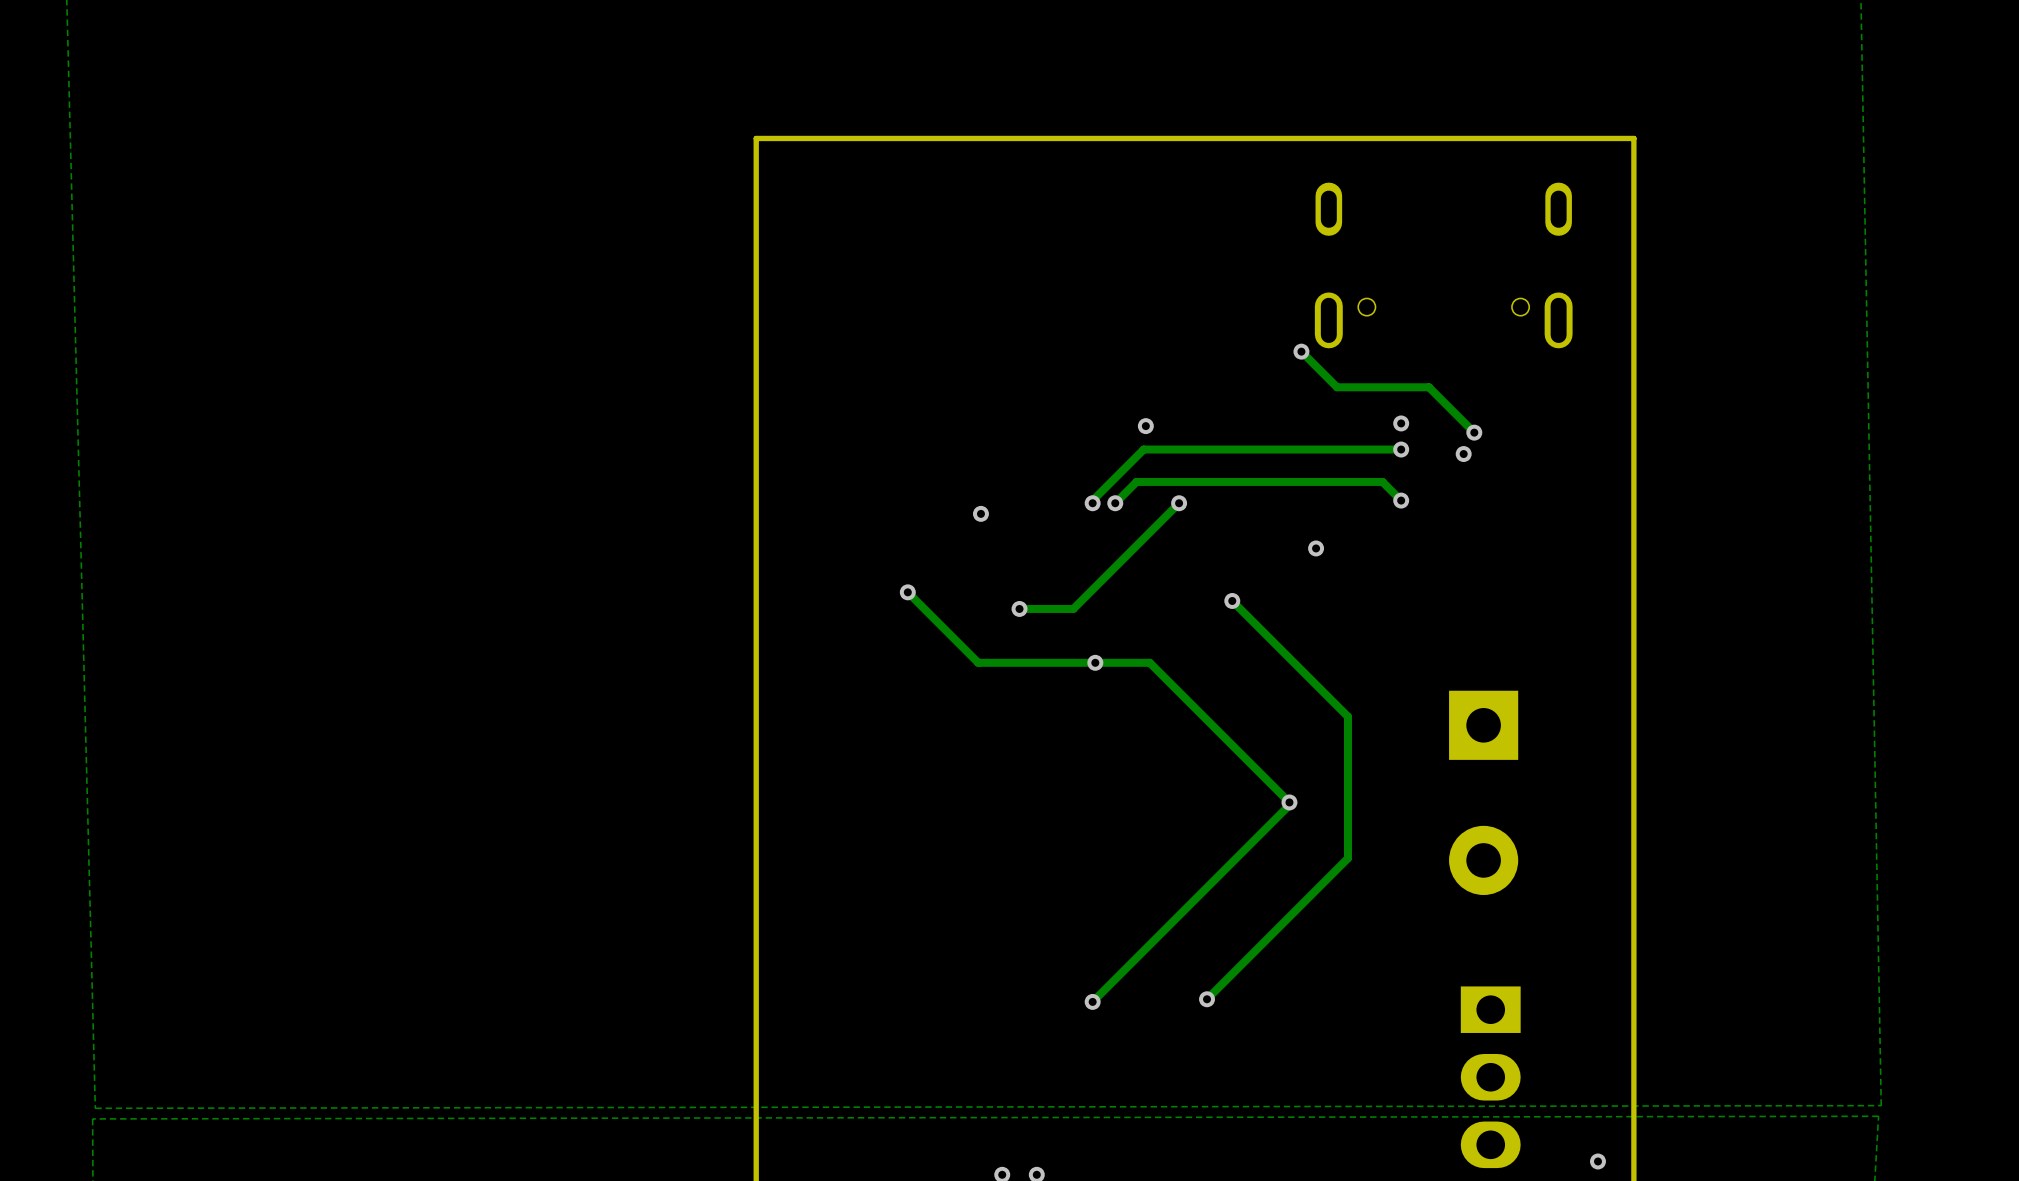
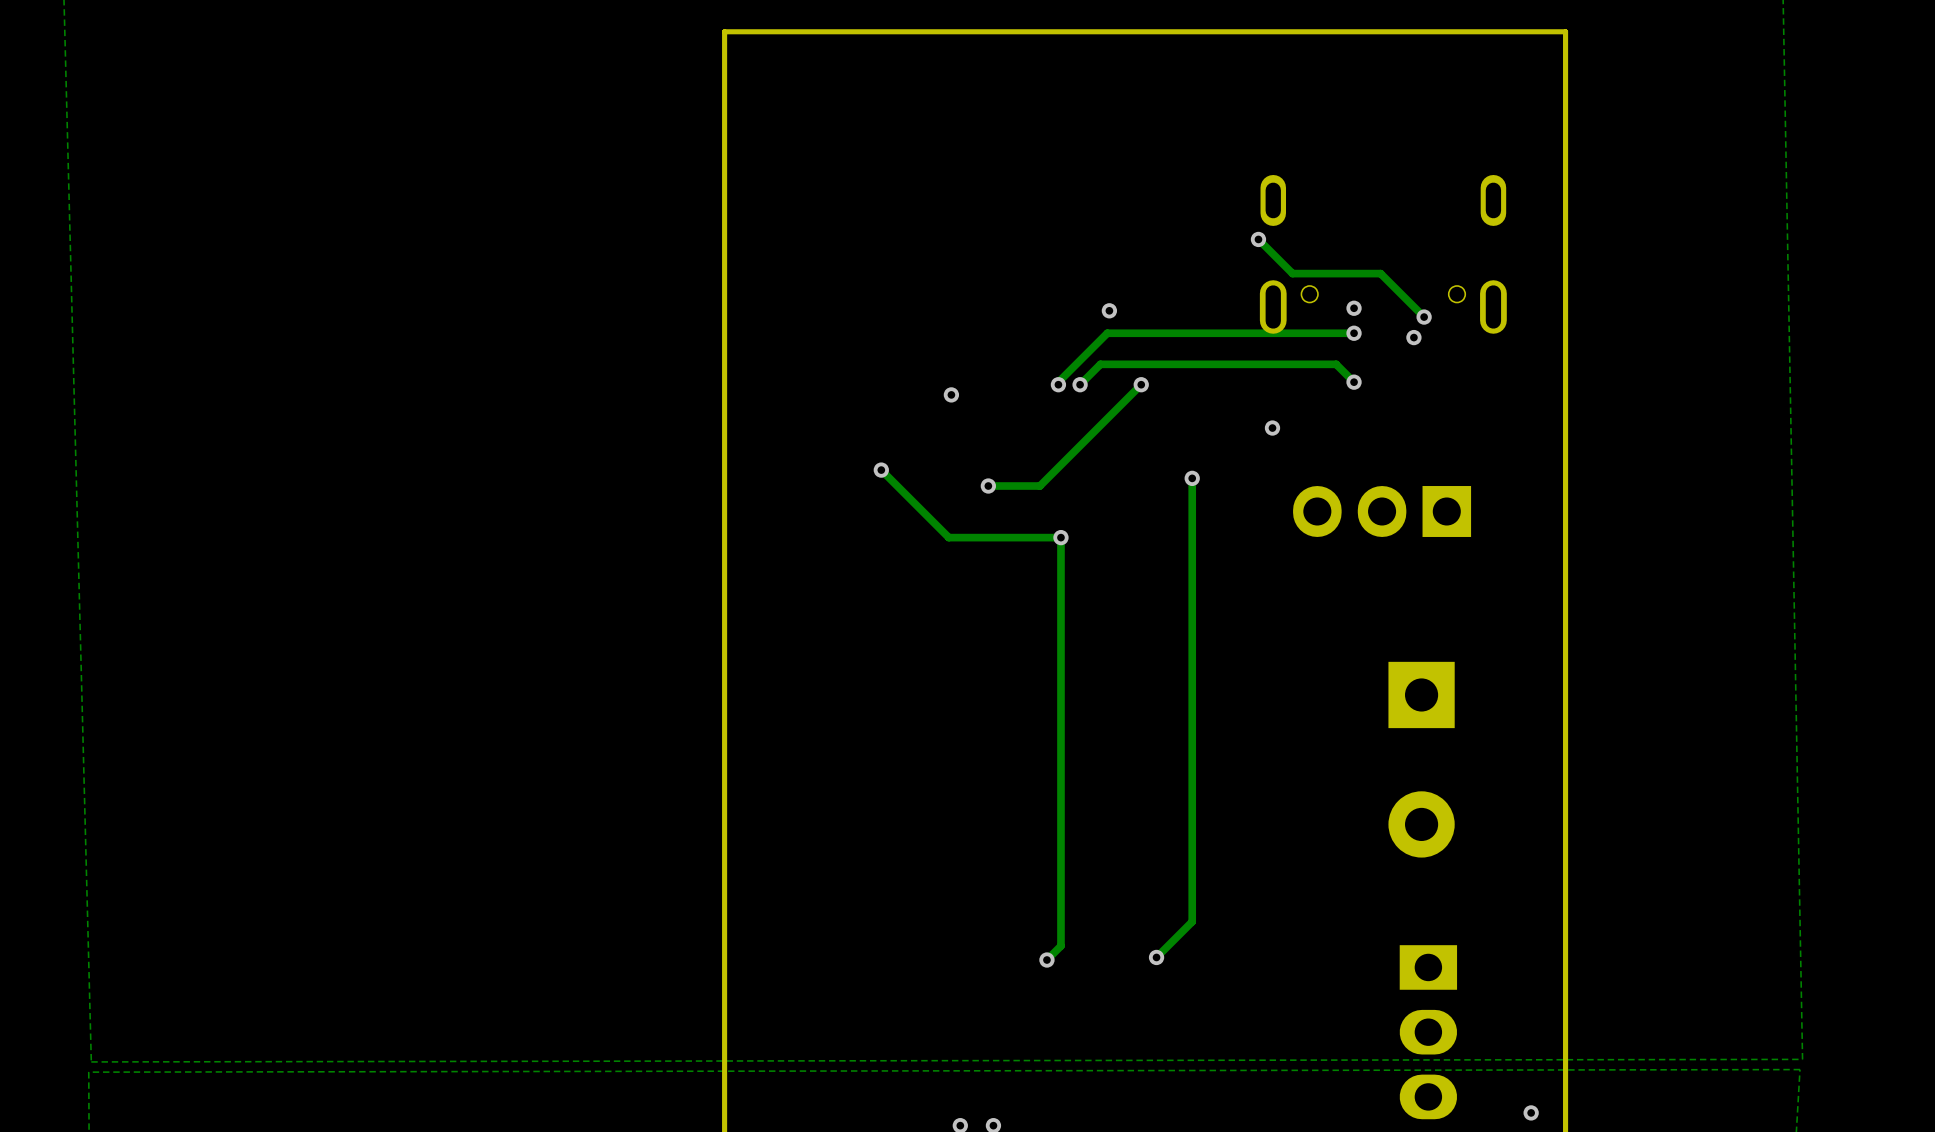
board edge: (1633, 138) (756, 138) -> (1565, 132) (1565, 31) (724, 31) (724, 132)
via: none -> (1258, 239)
via: none -> (1354, 308)
via: none -> (1109, 310)
via: none -> (1424, 317)
via: none -> (1354, 333)
track: (1301, 351) (1337, 387) (1428, 387) (1474, 432) -> (1258, 239) (1292, 273) (1380, 273) (1424, 317)
via: (1301, 351) -> none
via: none -> (1413, 337)
via: none -> (1354, 382)
via: none -> (1058, 384)
via: none -> (1080, 384)
via: none -> (1141, 384)
via: none -> (951, 394)
via: (1401, 423) -> none
via: (1145, 426) -> none
via: (1474, 432) -> none
via: none -> (1272, 428)
track: (1401, 449) (1143, 449) (1092, 500) (1092, 503) -> (1354, 333) (1107, 333) (1058, 382) (1058, 384)
via: (1401, 449) -> none
via: (1463, 454) -> none
via: none -> (881, 470)
via: none -> (1192, 478)
track: (1401, 500) (1382, 481) (1136, 481) (1115, 503) -> (1354, 382) (1336, 364) (1100, 364) (1080, 384)
via: (1401, 500) -> none
via: (1092, 503) -> none
via: (1115, 503) -> none
track: (1179, 503) (1073, 608) (1019, 608) -> (1141, 384) (1039, 486) (988, 486)
via: (1179, 503) -> none
via: none -> (988, 486)
via: (980, 513) -> none
part: none -> (1382, 511)
via: (1316, 548) -> none
via: none -> (1060, 537)
track: (907, 592) (978, 662) (1149, 662) (1289, 802) (1289, 805) (1107, 987) -> (881, 470) (948, 537) (1060, 537) (1060, 945)
via: (907, 592) -> none
track: (1232, 600) (1347, 716) (1347, 858) (1244, 962) -> (1192, 478) (1192, 921)
via: (1232, 600) -> none
via: (1019, 608) -> none
via: (1095, 662) -> none
via: (1289, 802) -> none

